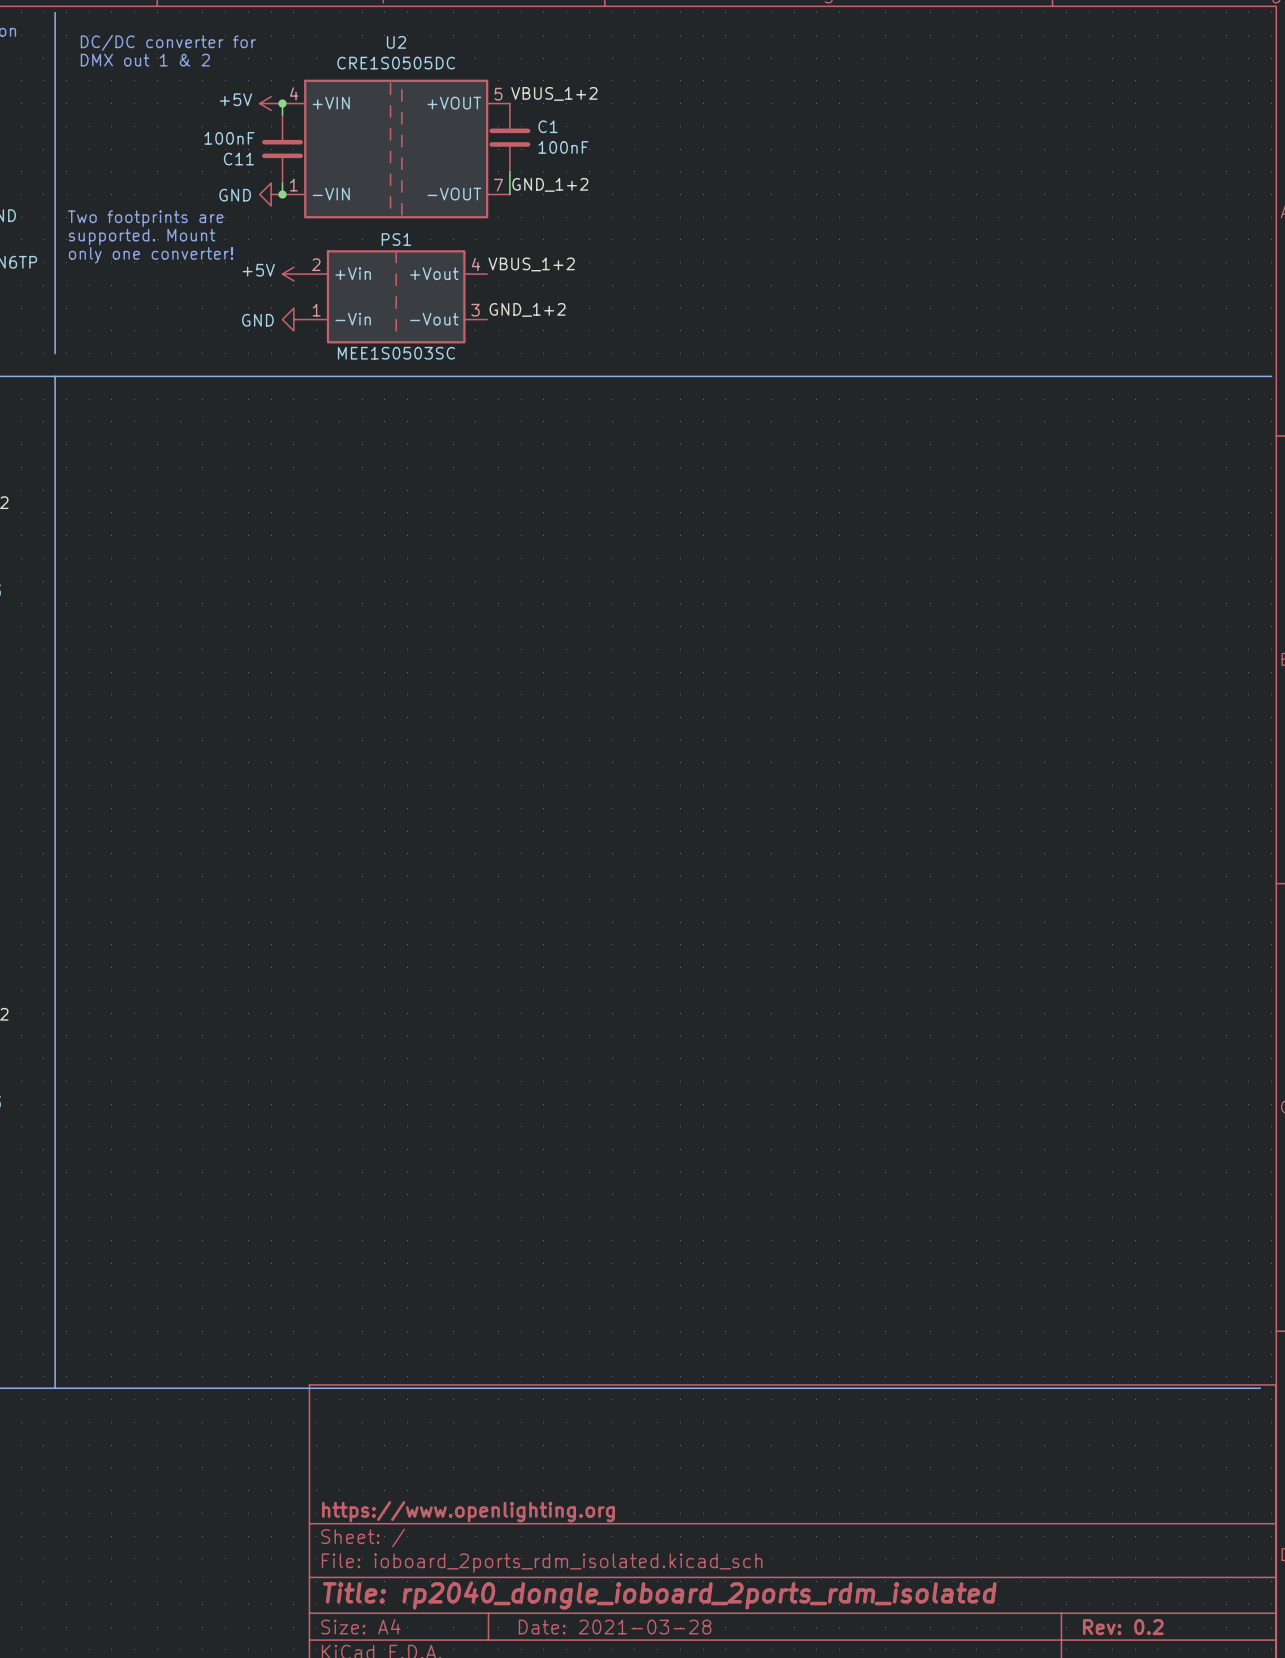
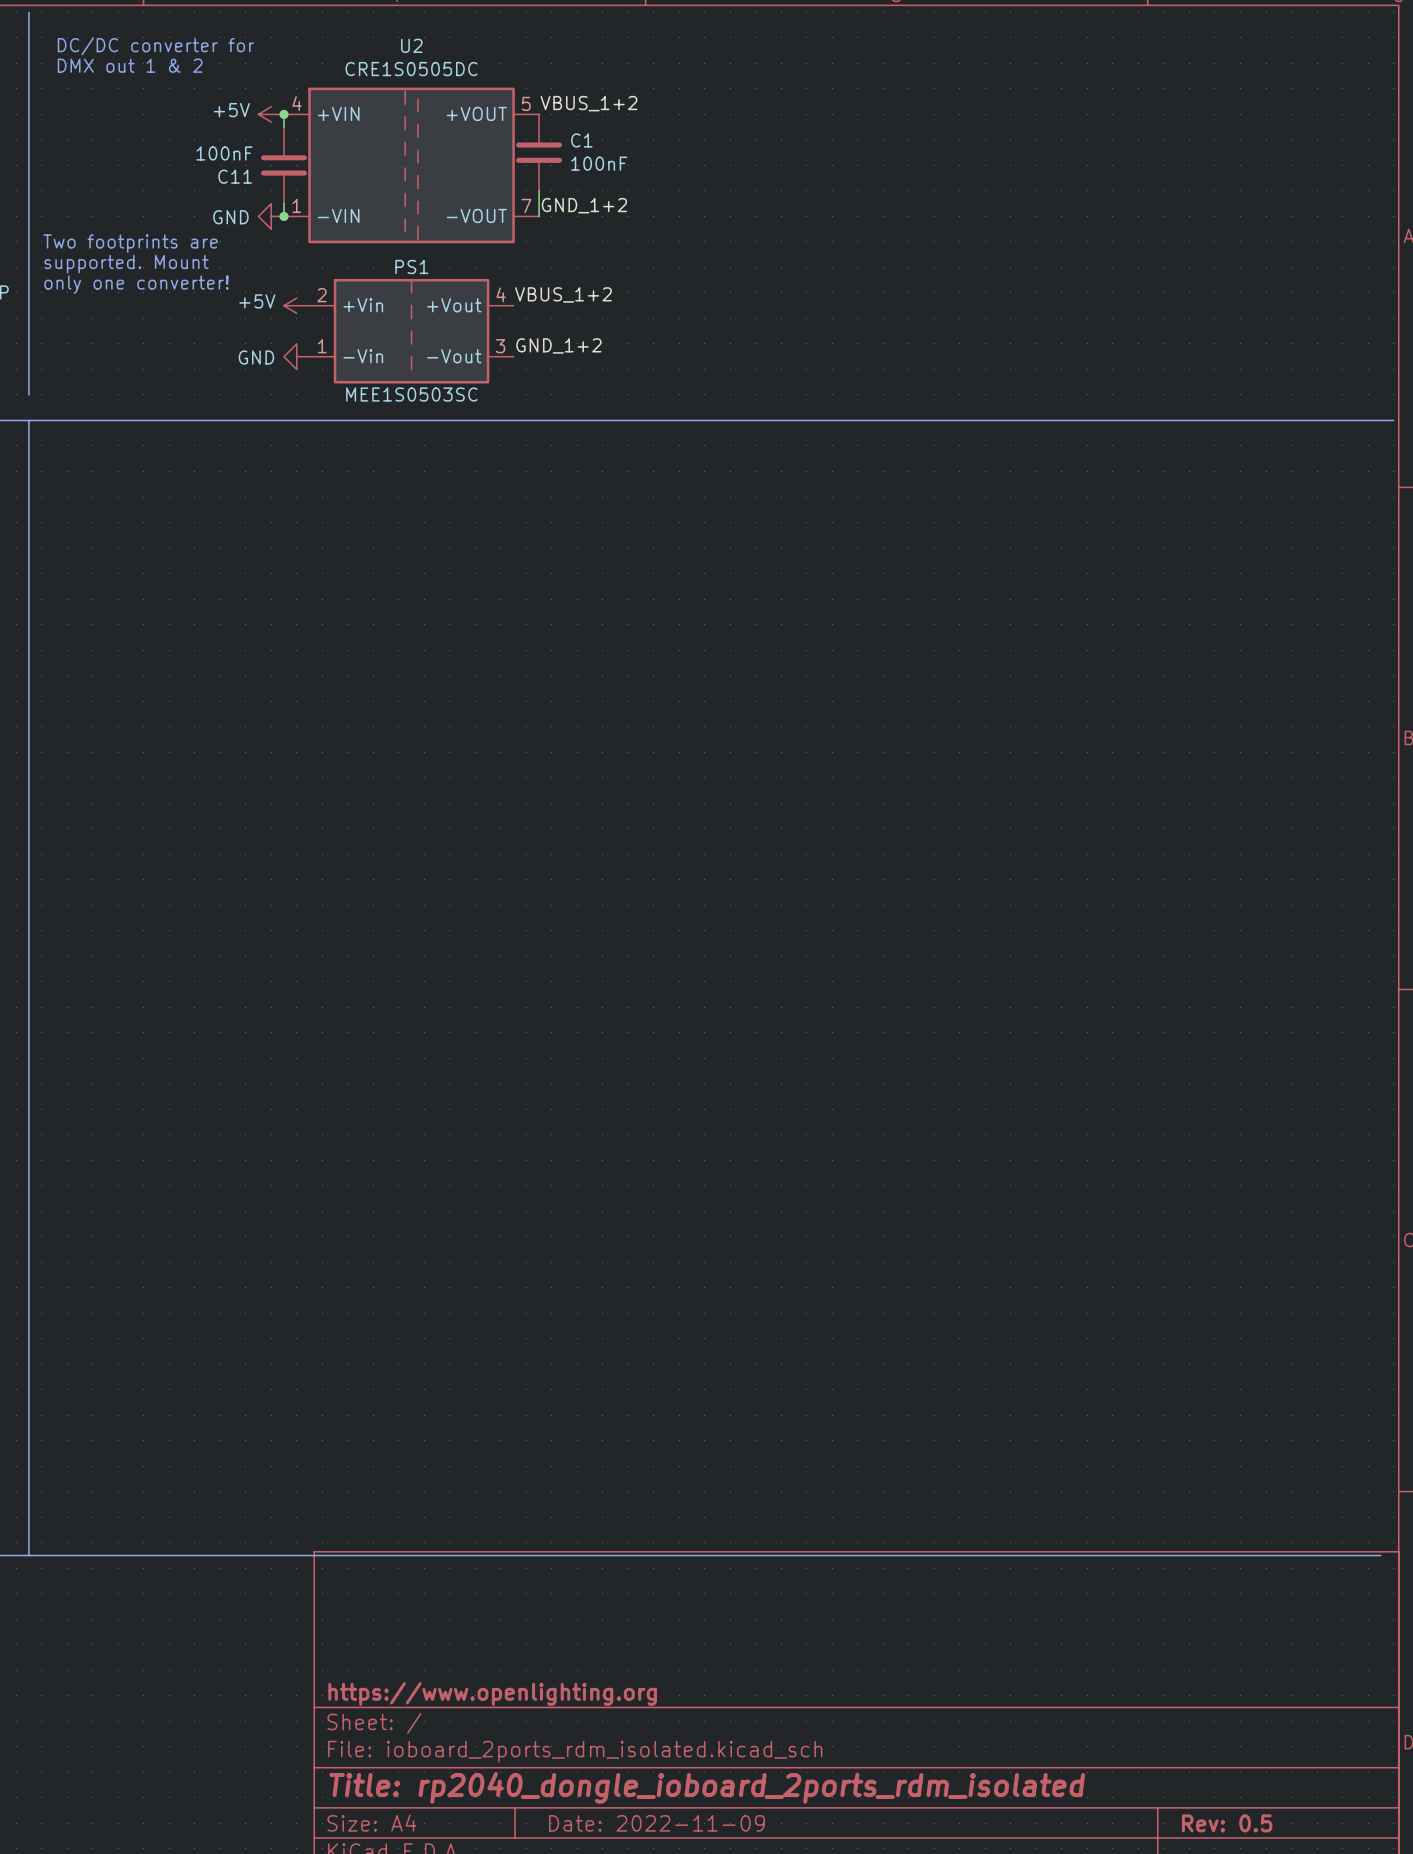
title block: Date: 2021-03-28 (615, 1627) -> Date: 2022-11-09 (657, 1823)
title block: Rev: 0.2 (1123, 1627) -> Rev: 0.5 (1227, 1823)

